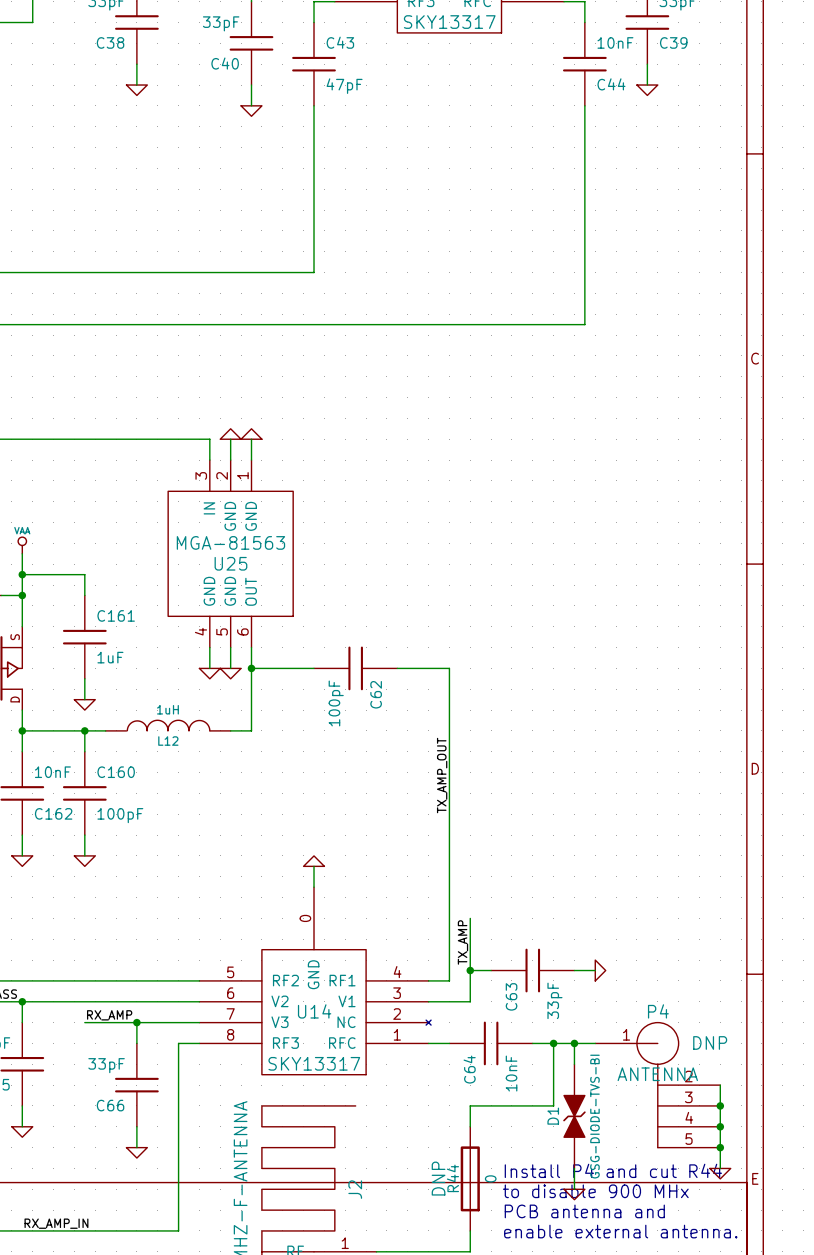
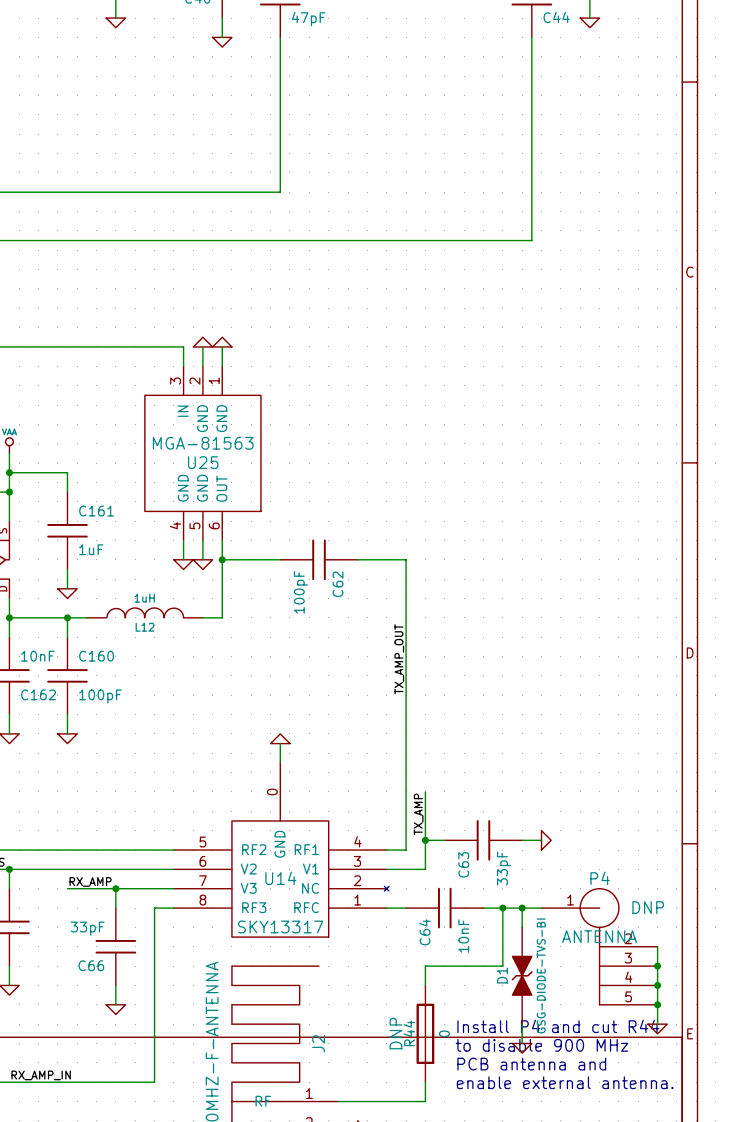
text: to disable 900 MHx (595, 1191) -> to disable 900 MHz (542, 1045)

